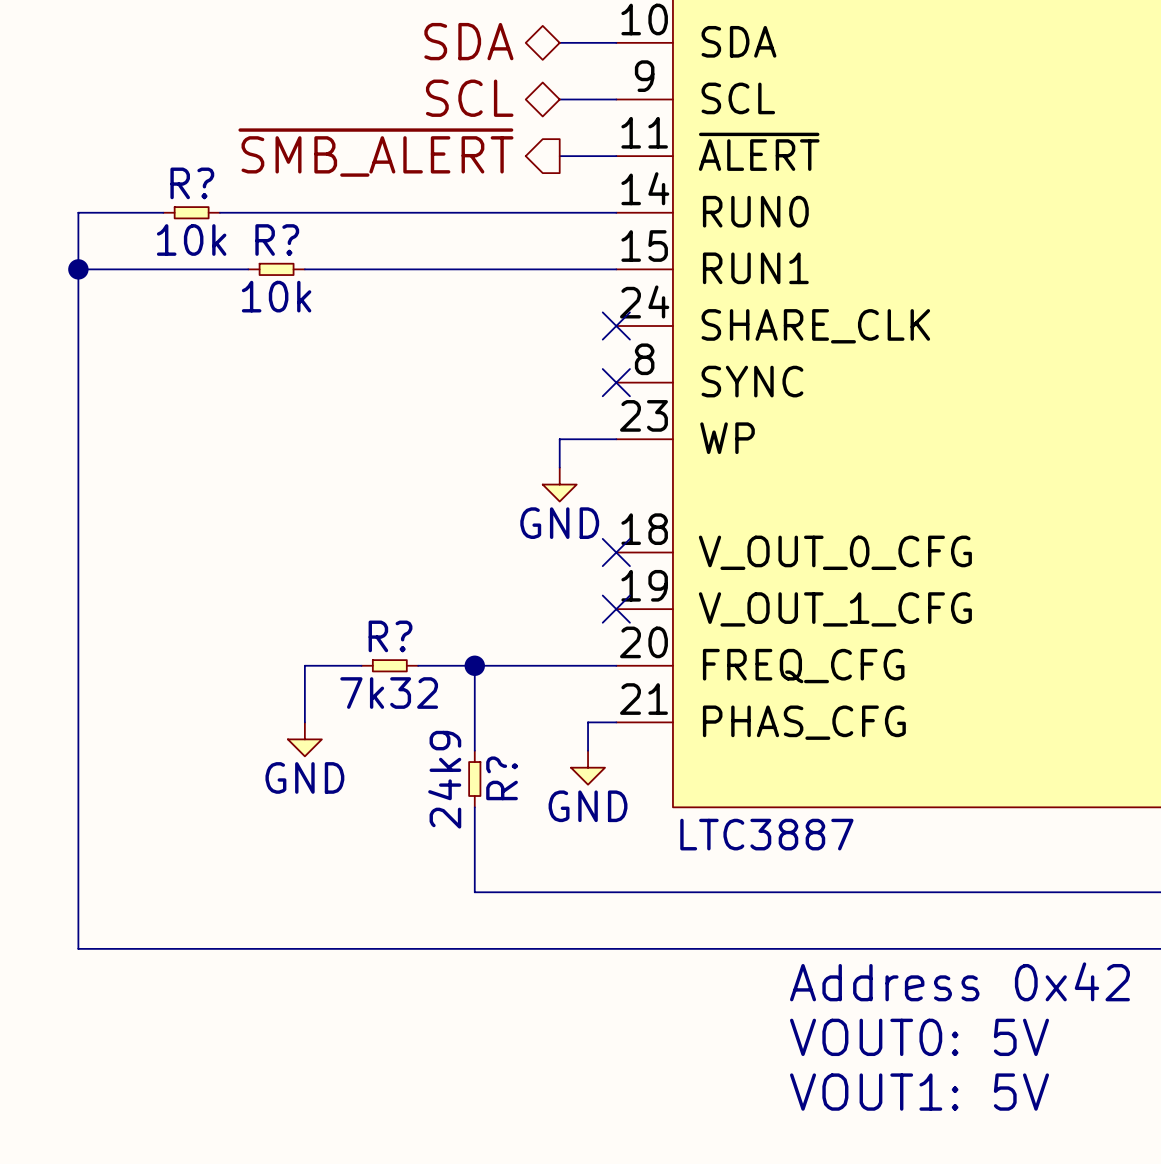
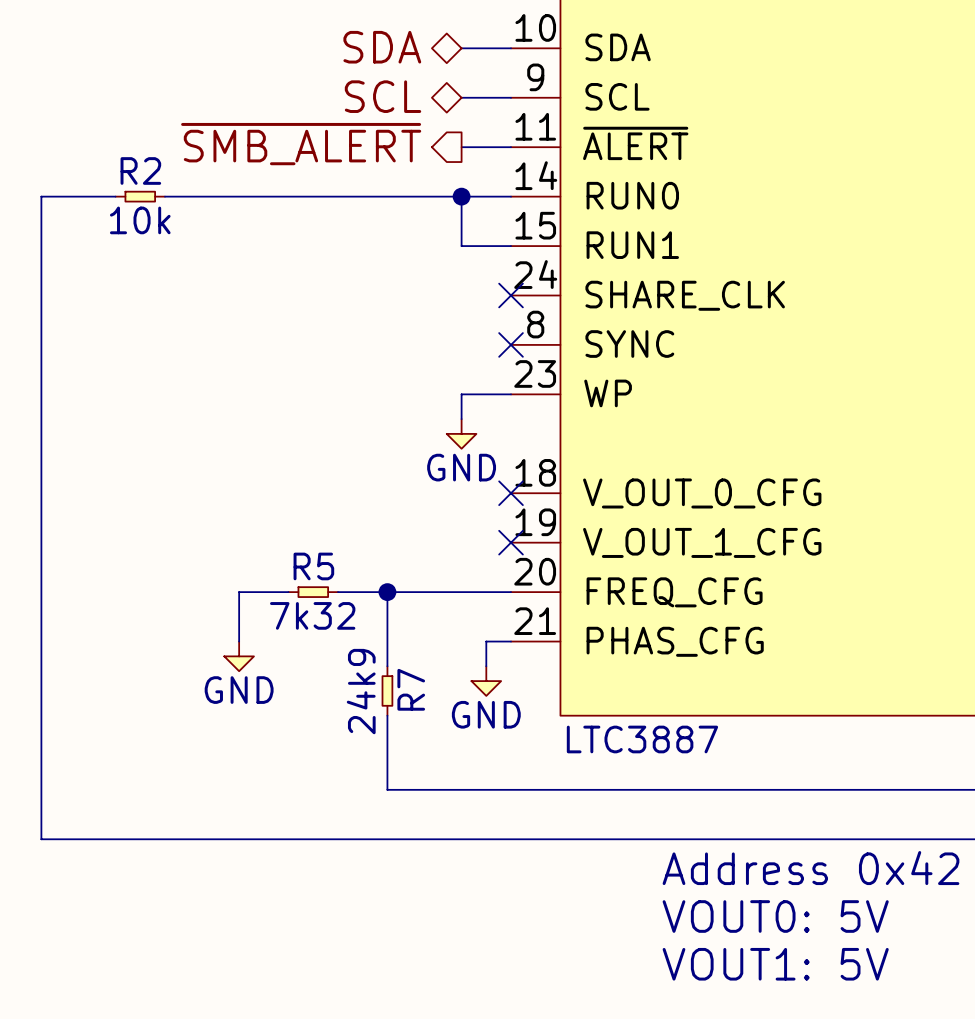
R? name: R? (192, 183) -> R2 (140, 170)
junction: none -> (461, 196)
wire: (78, 269) (248, 269) -> none
junction: (78, 269) -> none
R?: 10k (276, 269) -> none
wire: (304, 269) (559, 269) -> (461, 196) (461, 246)
R? name: R? (390, 636) -> R5 (313, 566)
R? name: R? (502, 778) -> R7 (411, 689)

